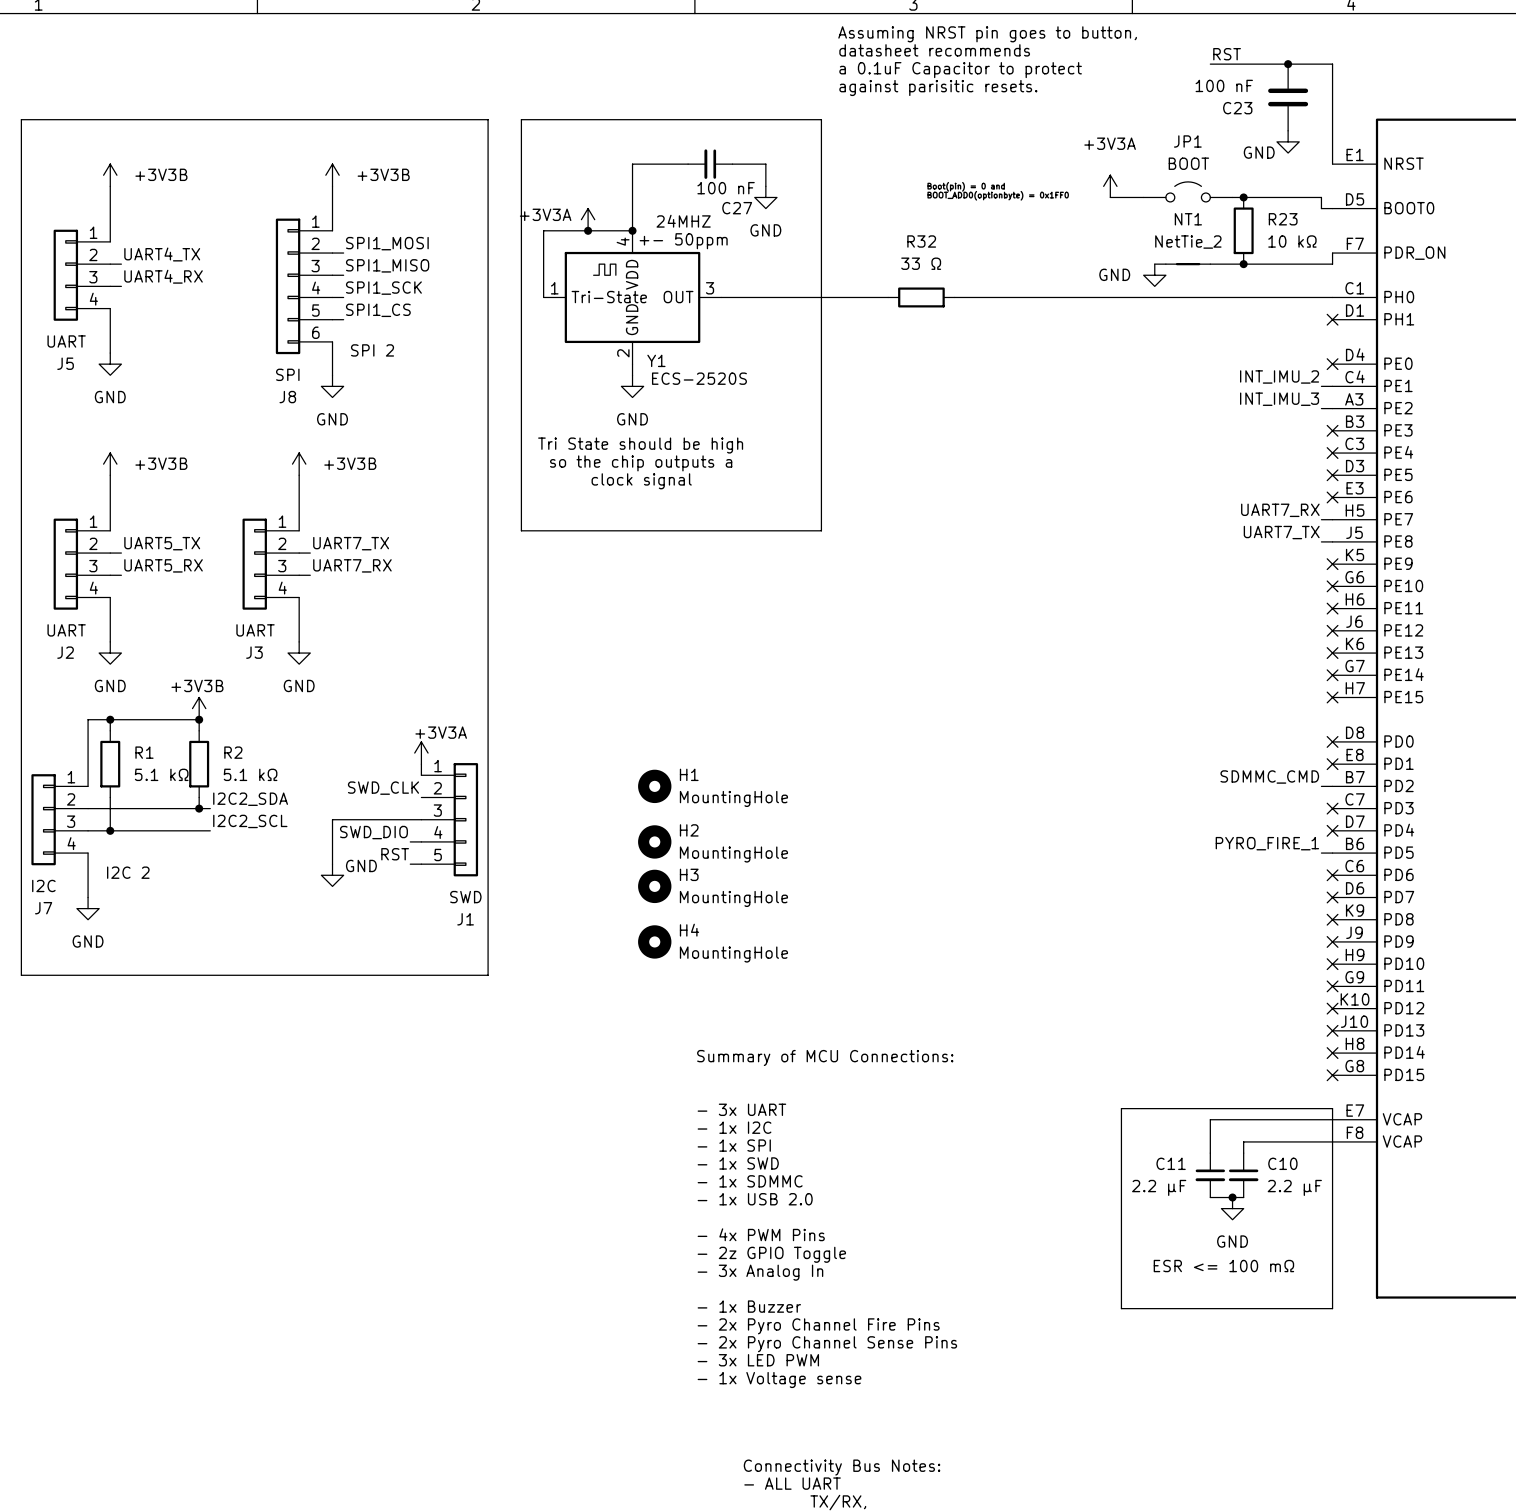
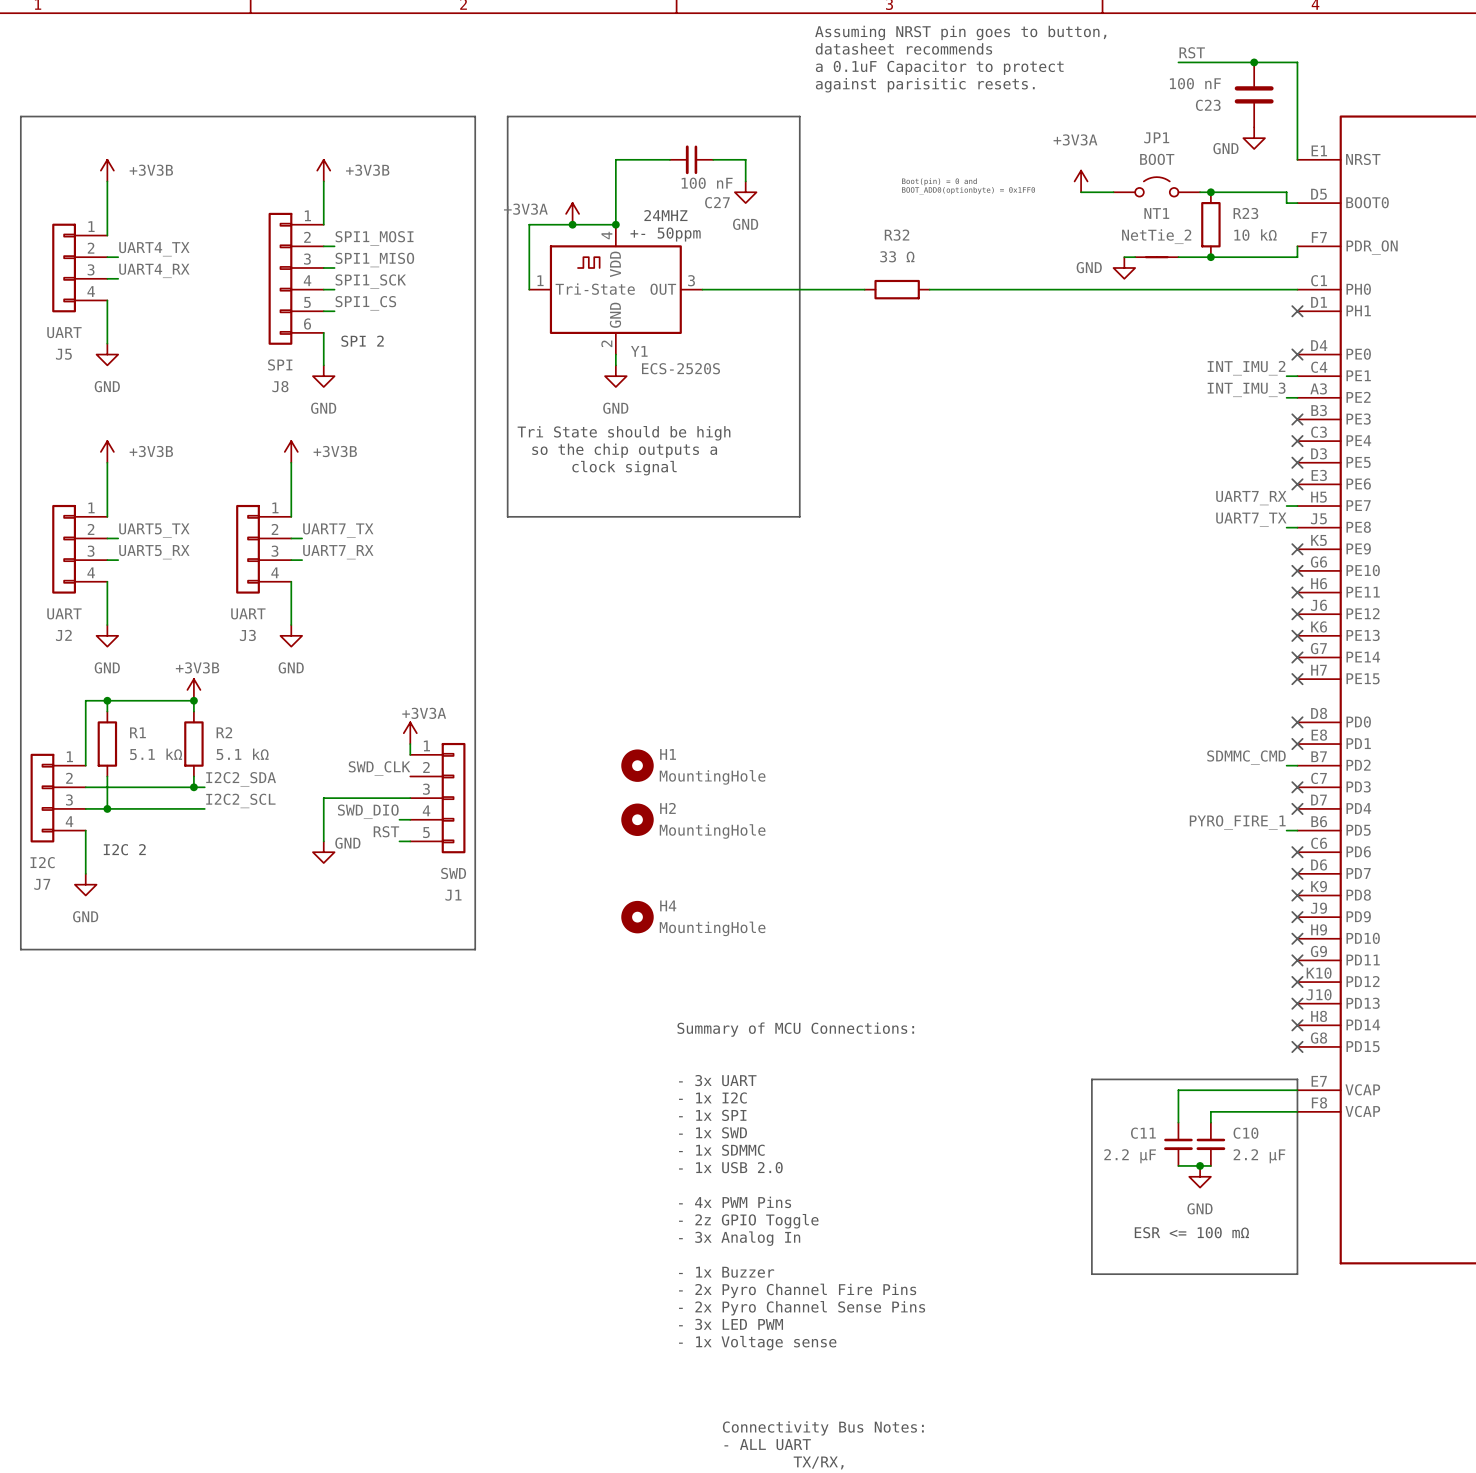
H3: MountingHole (654, 886) -> none

